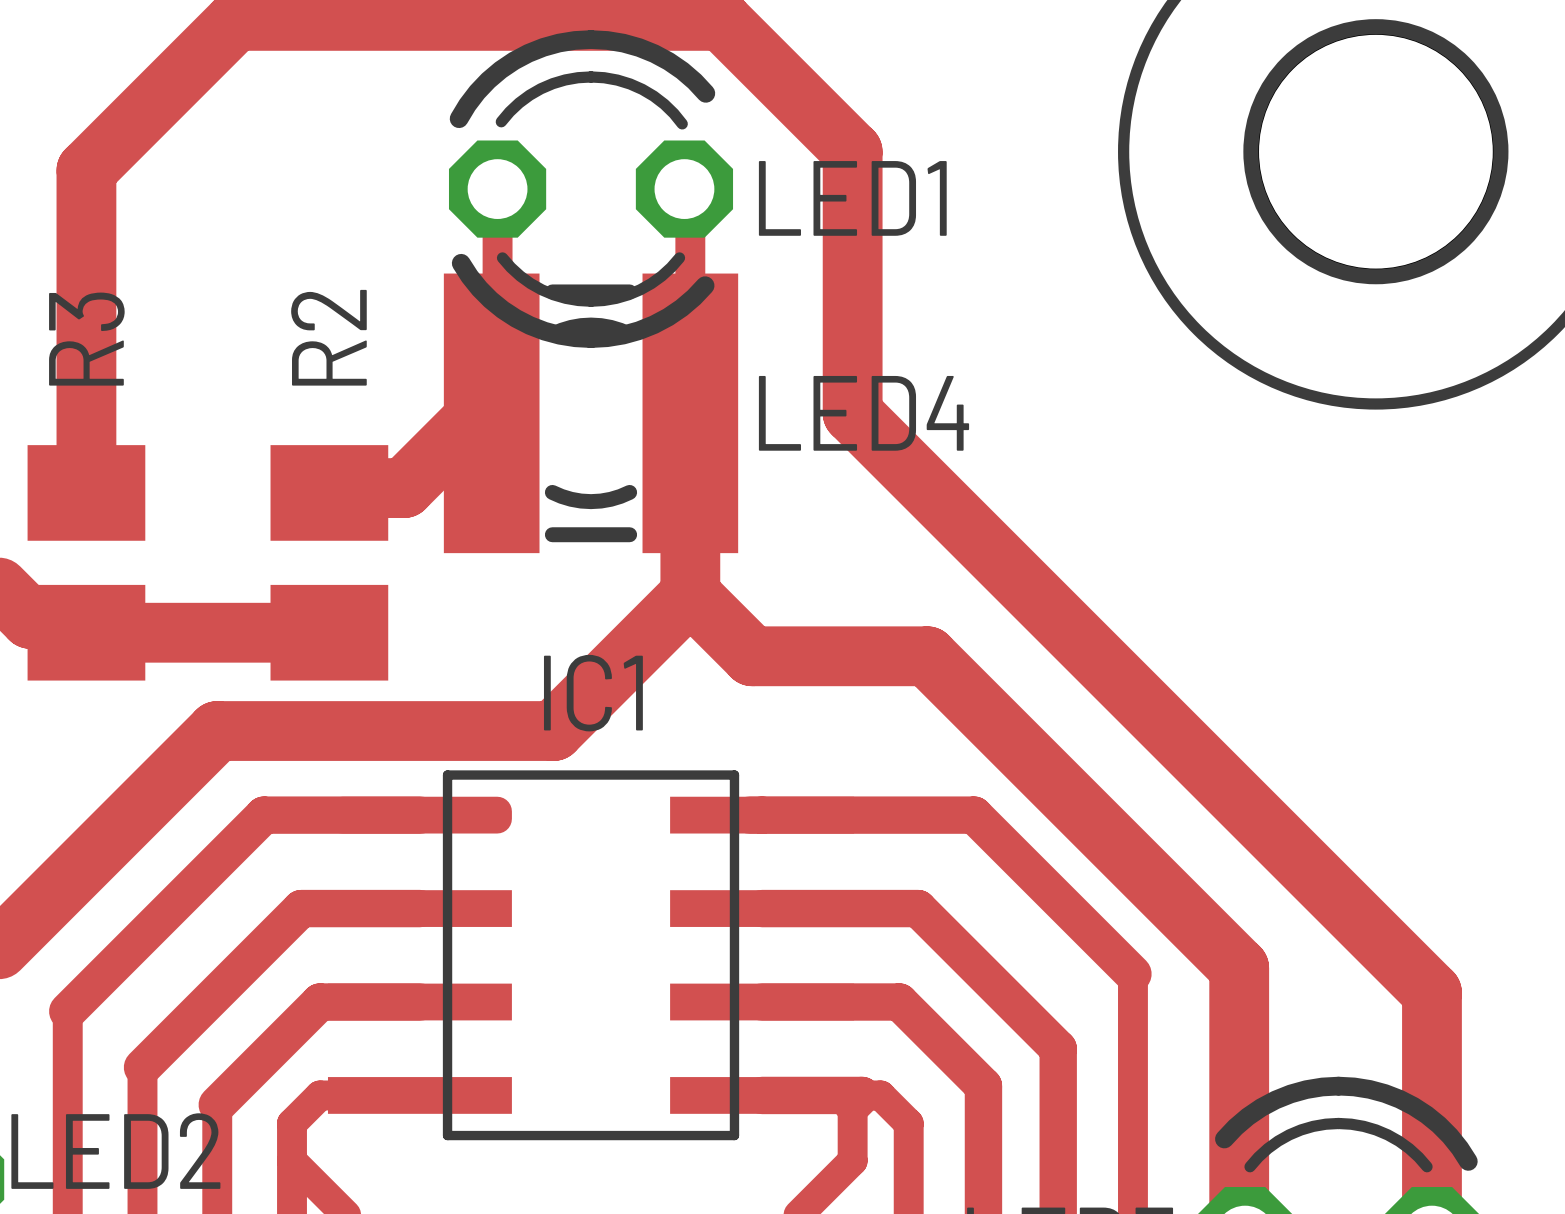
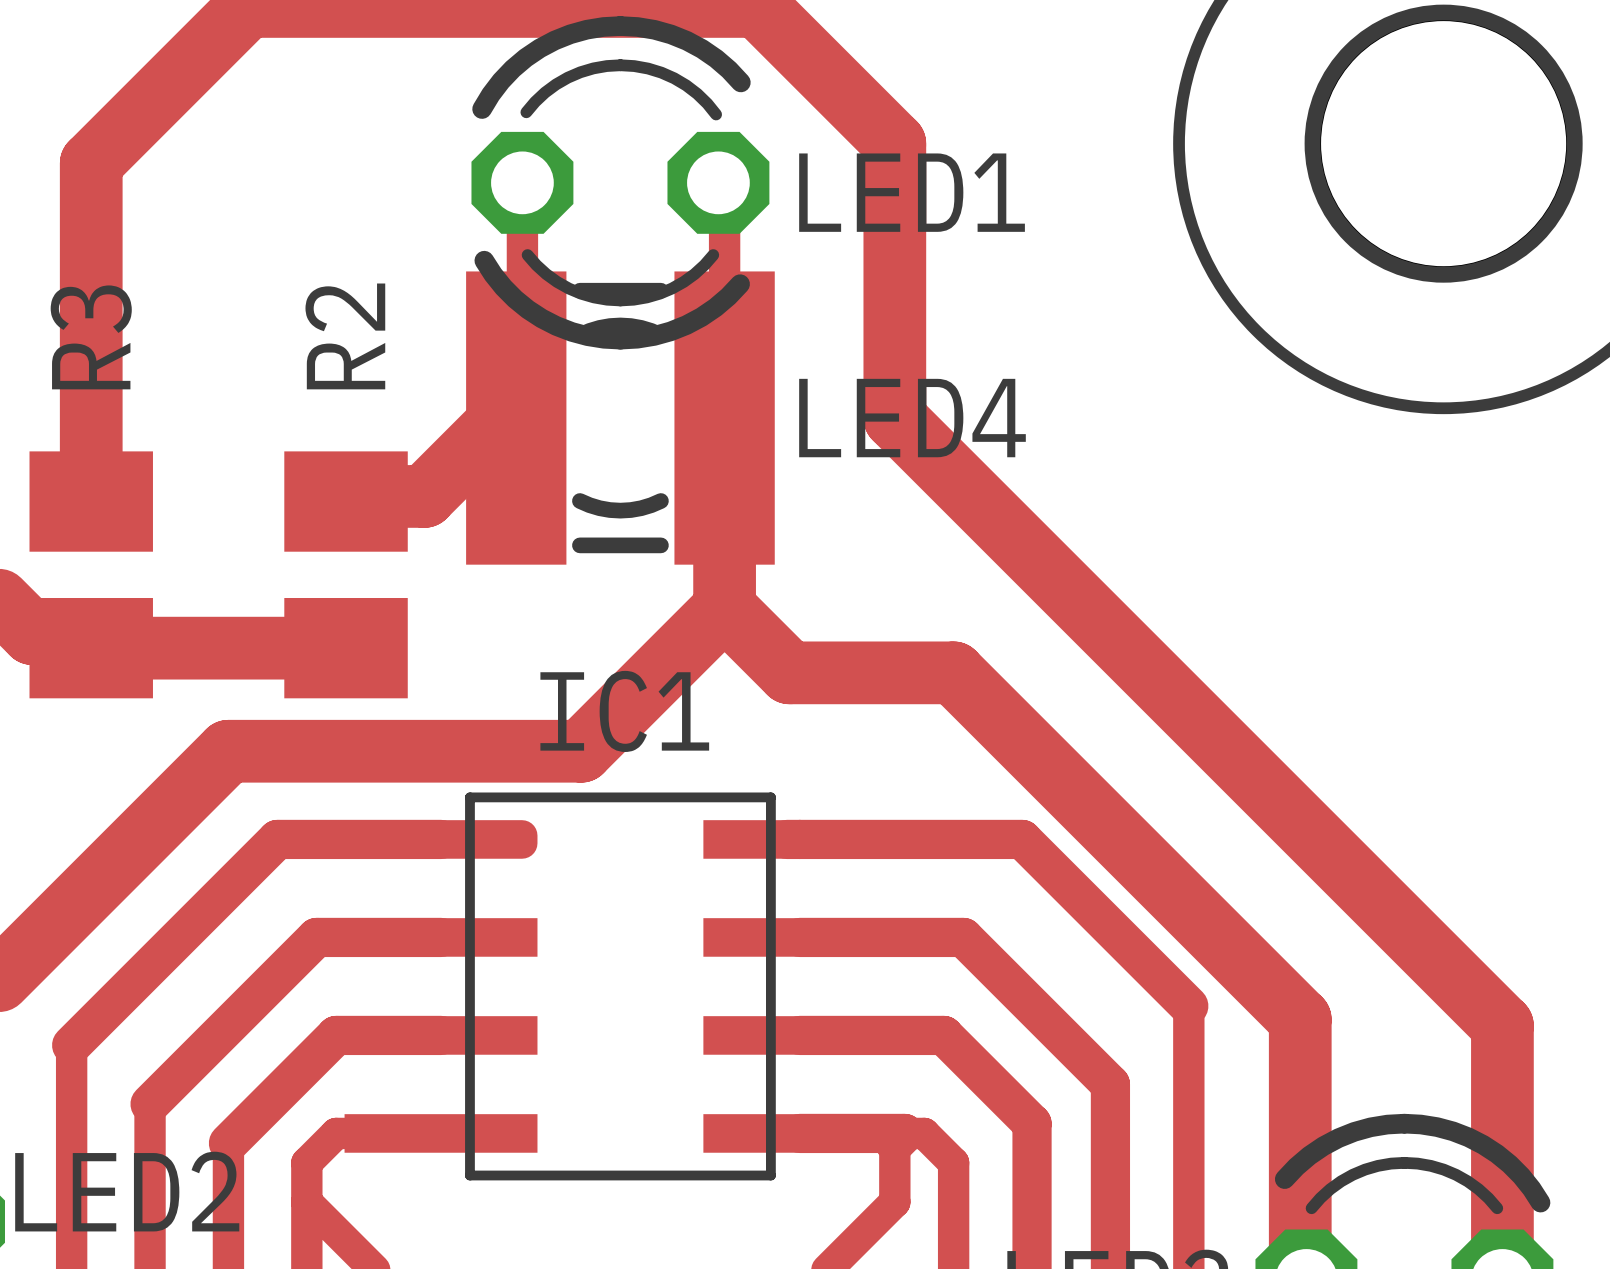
top track: (908, 656) (927, 656) (1239, 968) (1239, 986) -> (953, 672) (1300, 1019)

